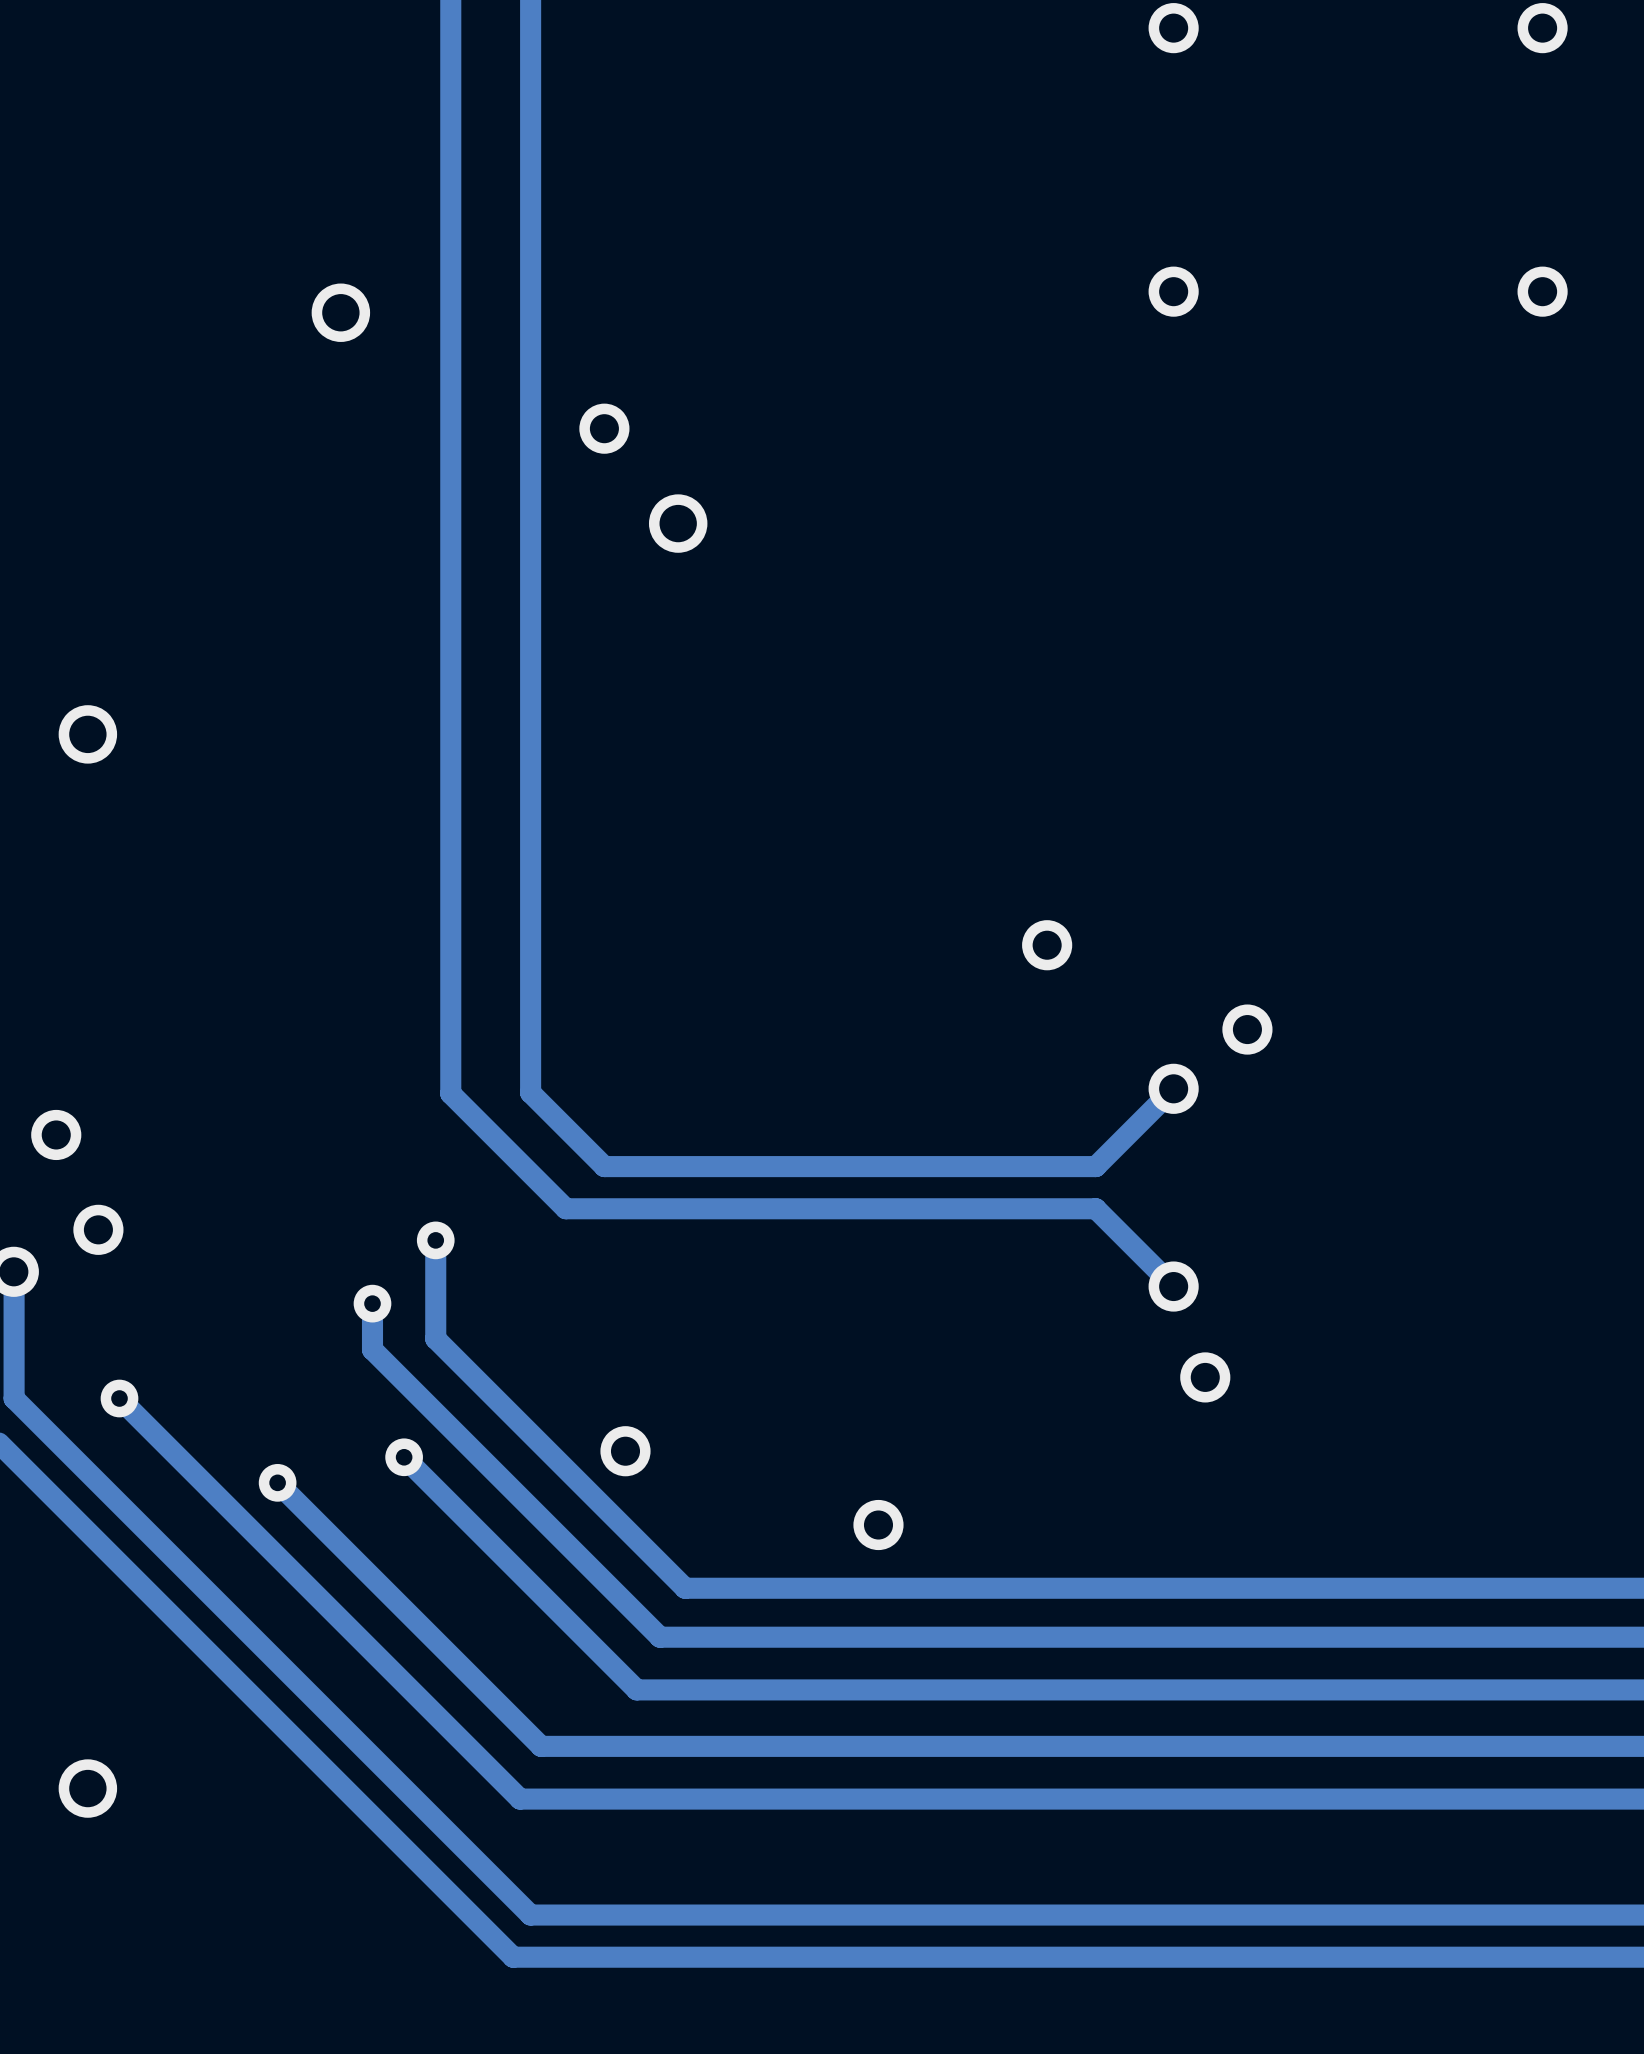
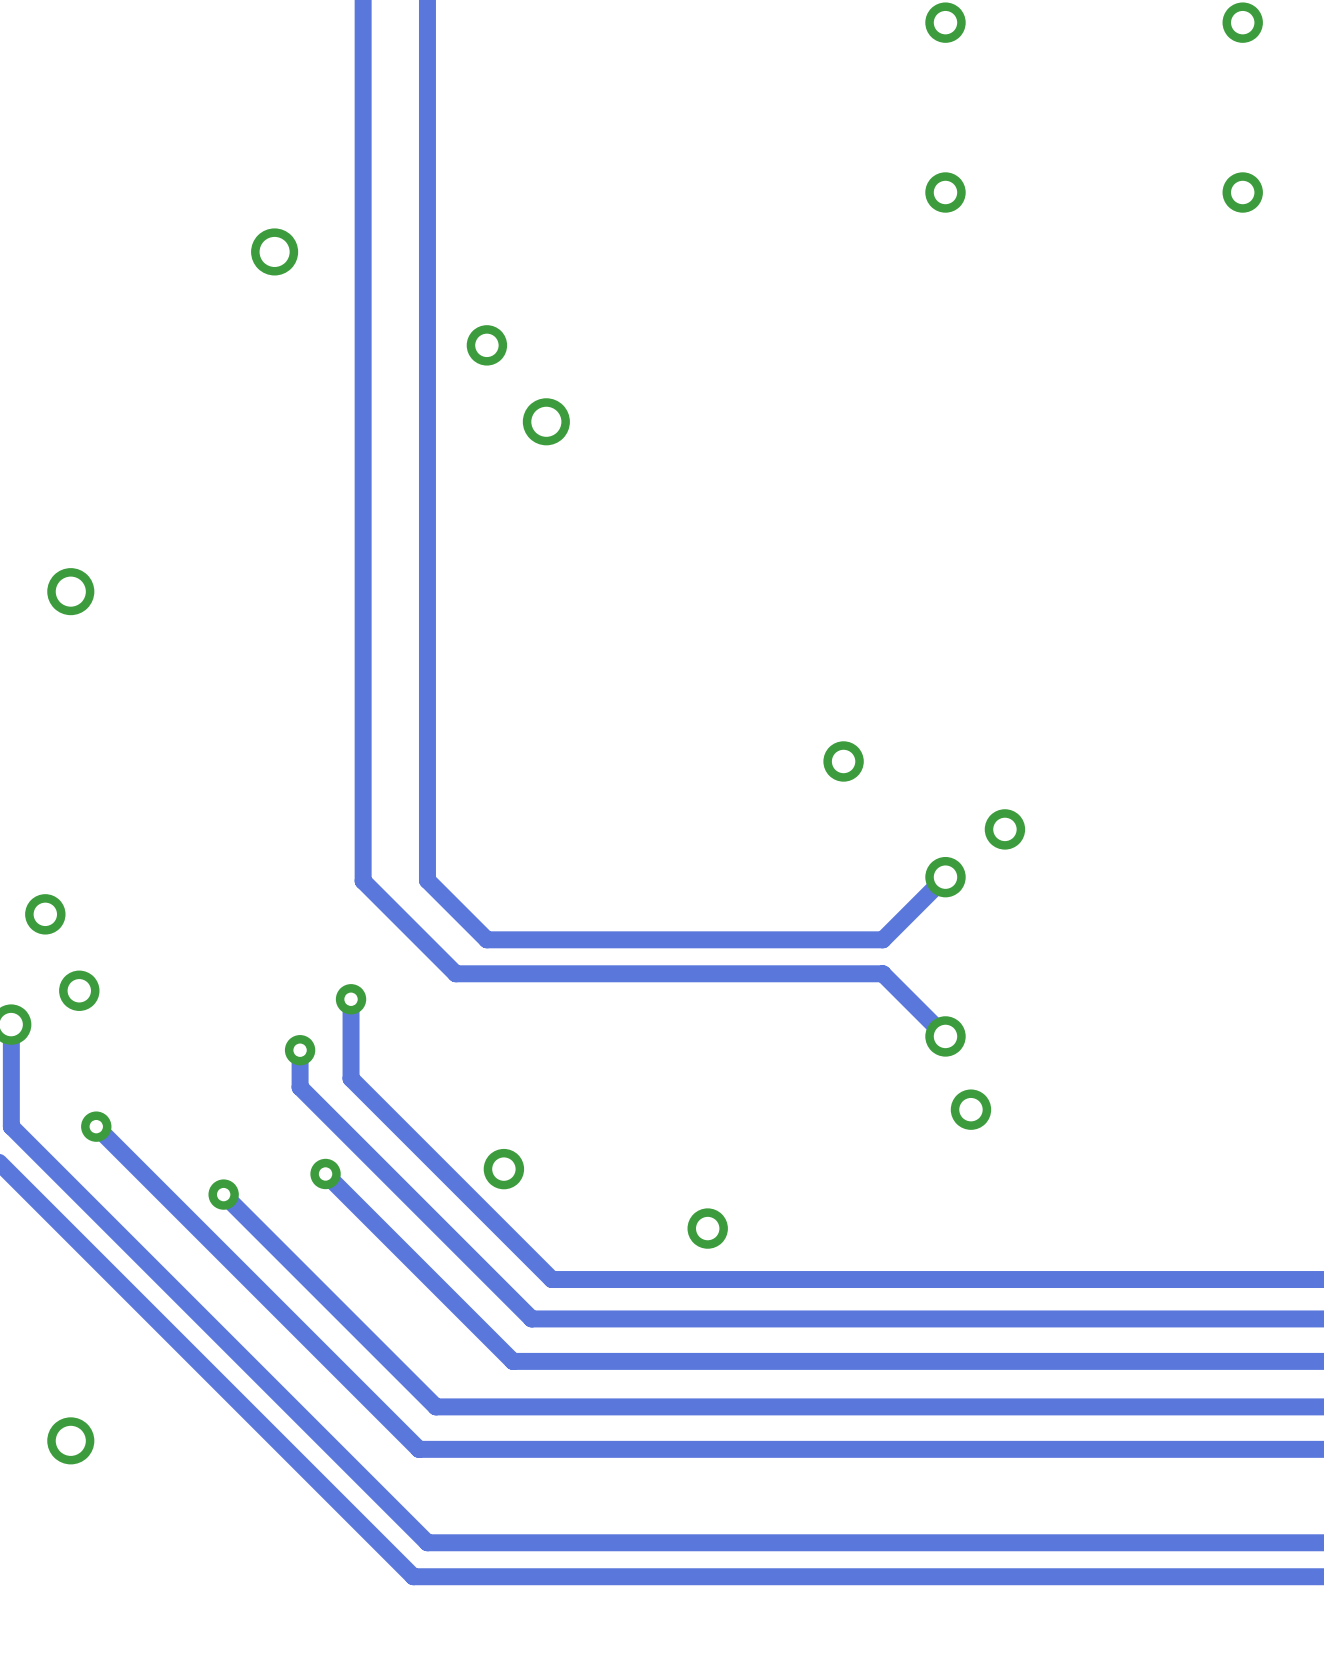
via position: (1173, 291) -> (945, 192)
via position: (1542, 291) -> (1242, 192)

